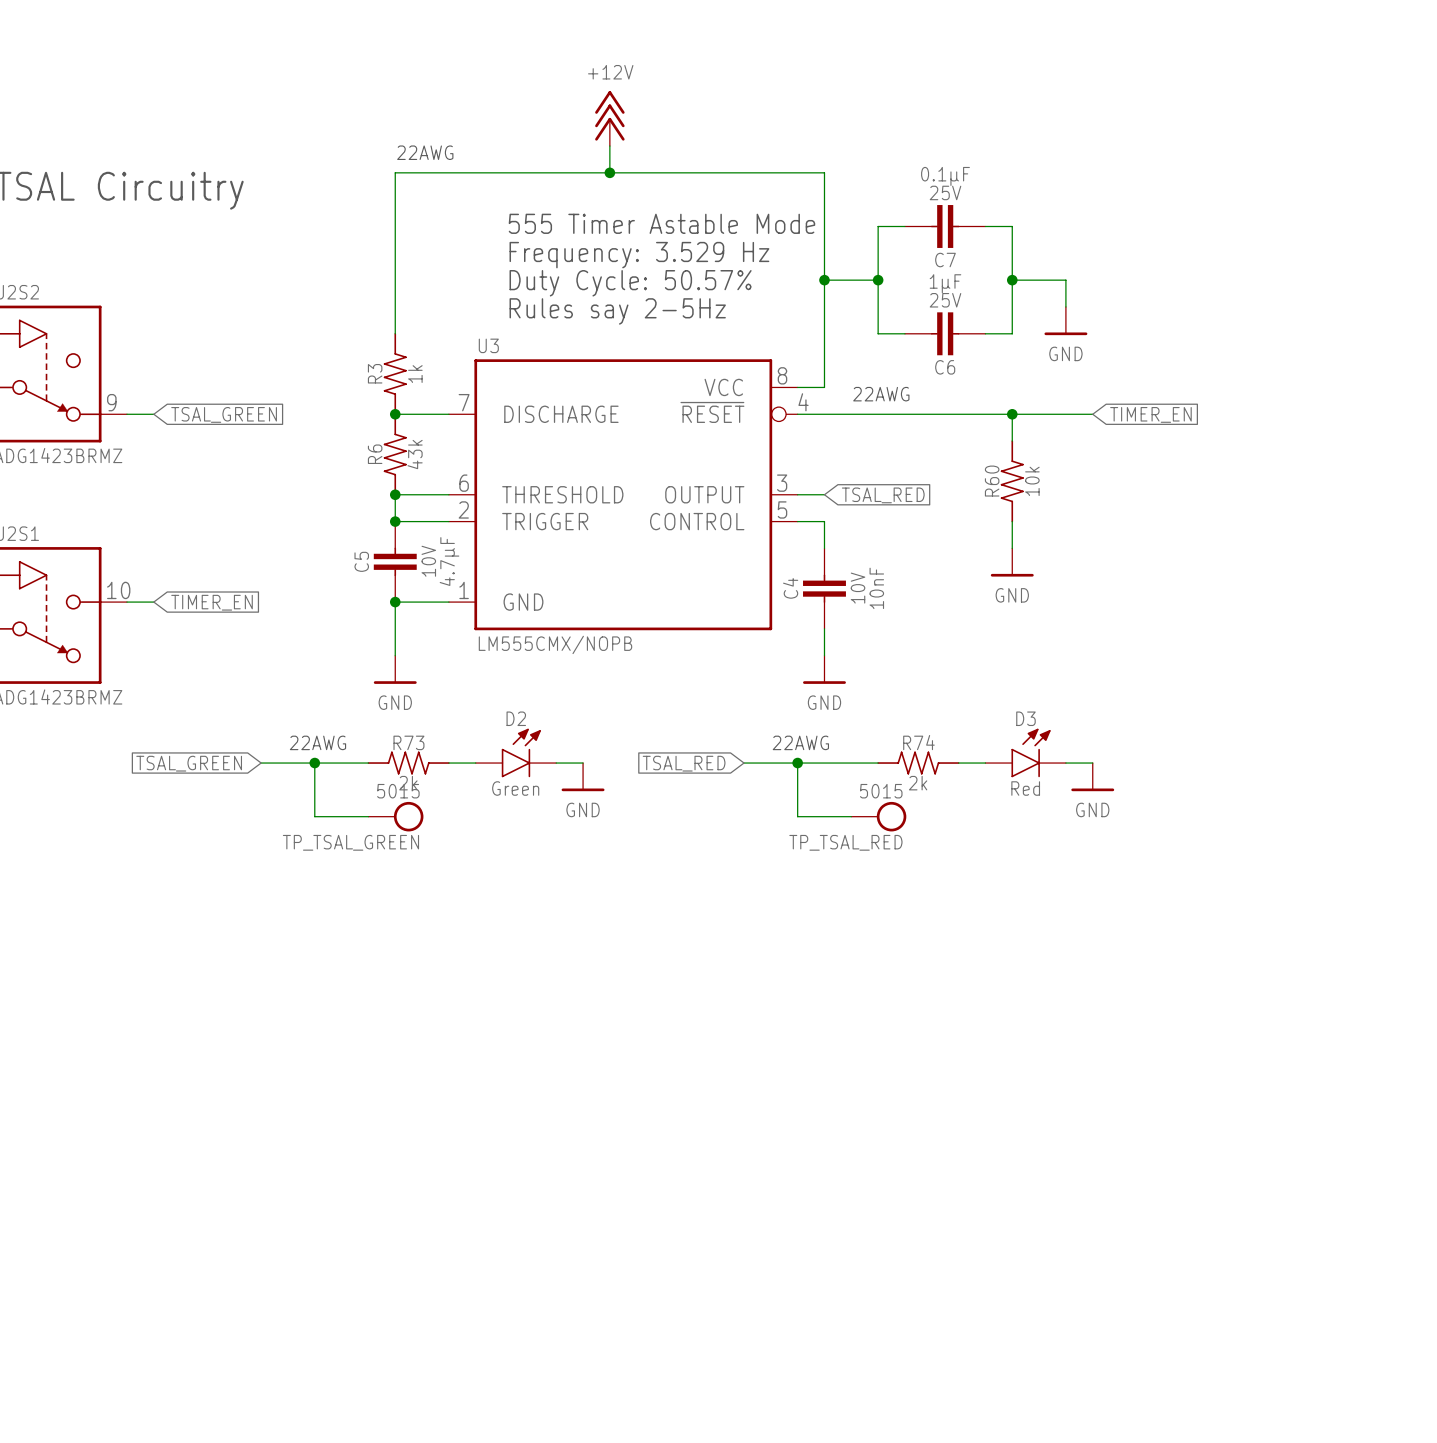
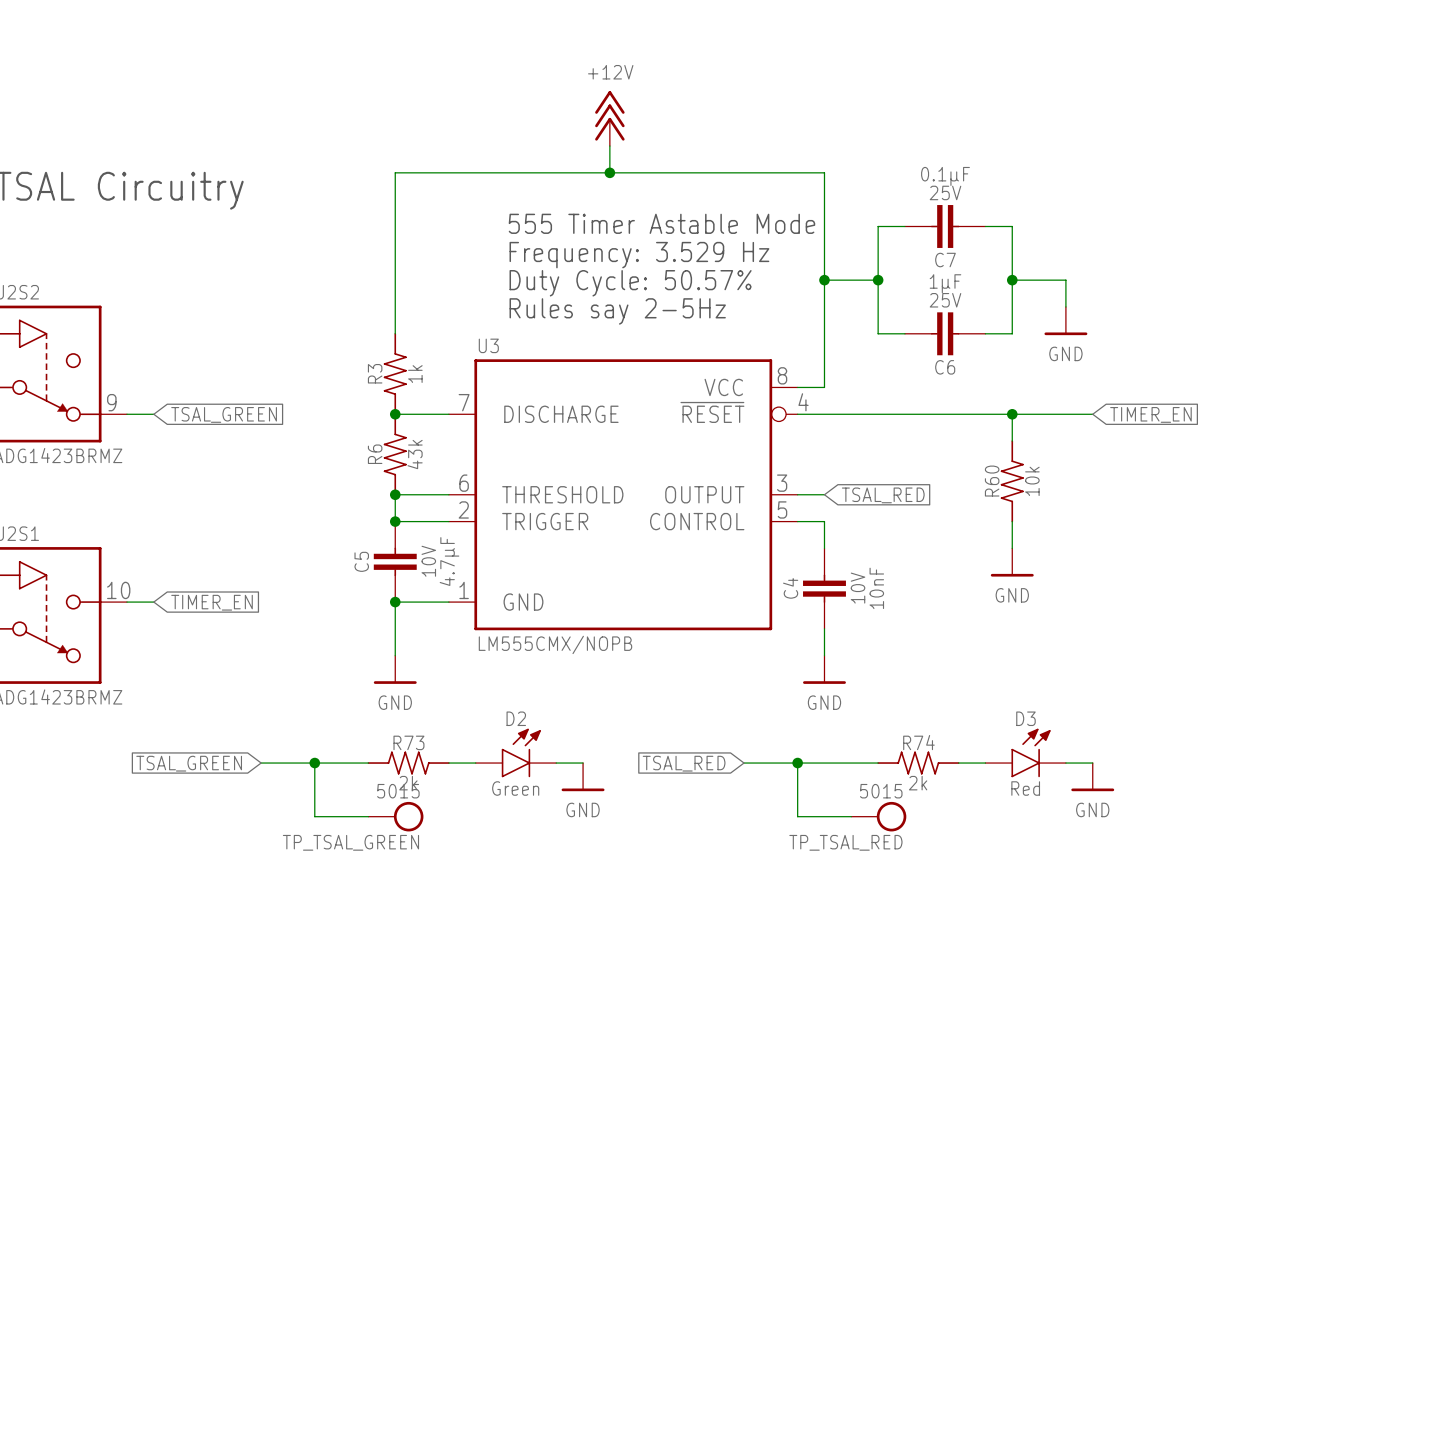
text: 22AWG (425, 152) -> none
text: 22AWG (881, 394) -> none
text: 22AWG (317, 742) -> none
text: 22AWG (800, 742) -> none

